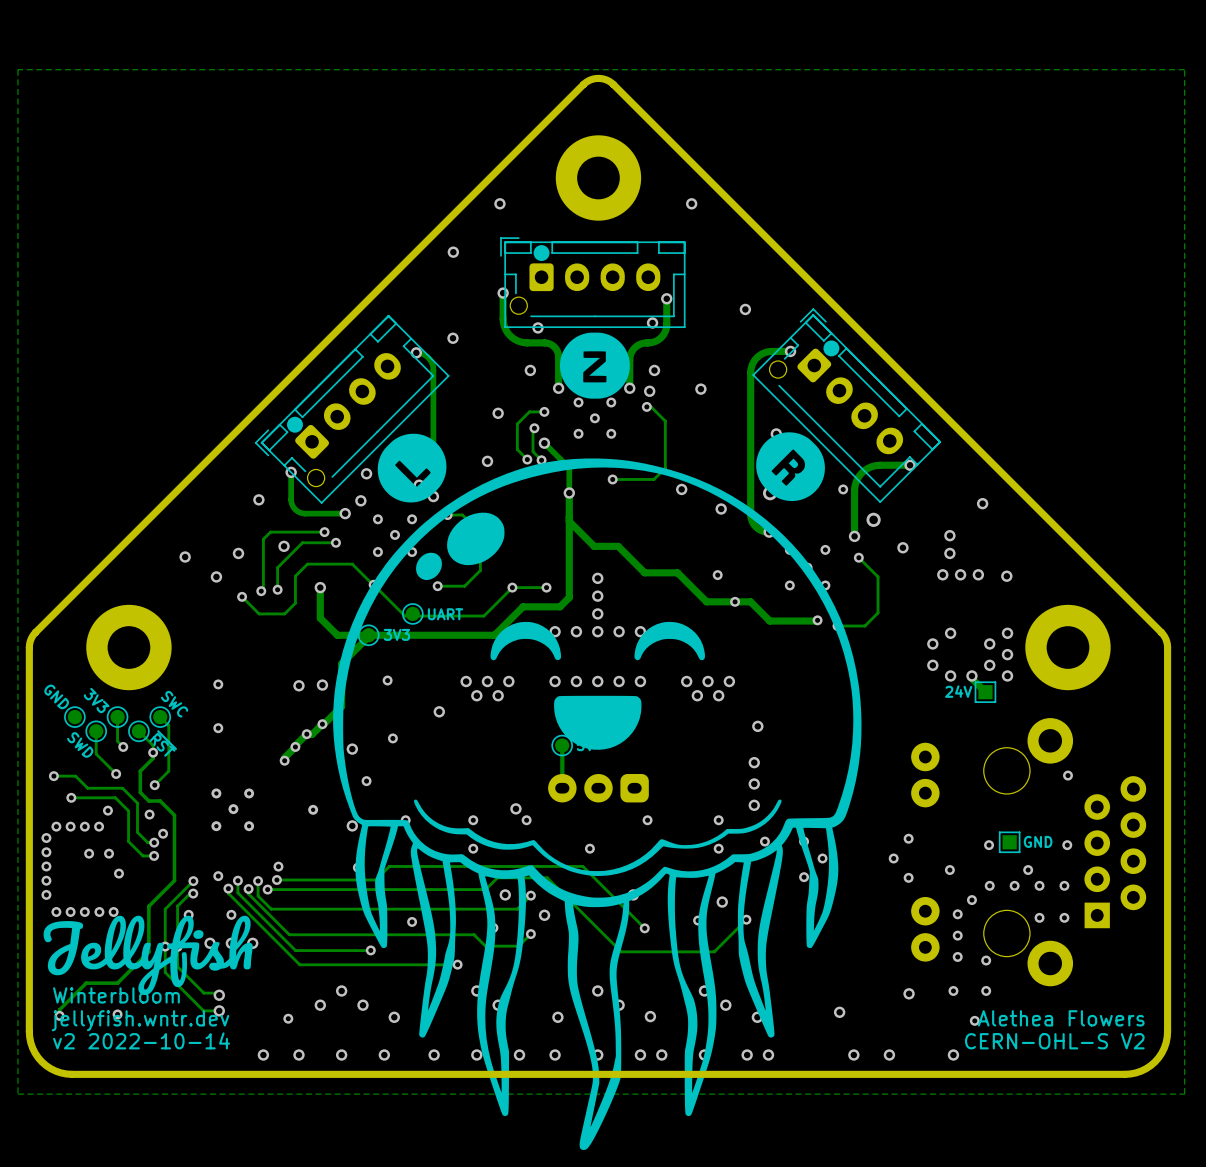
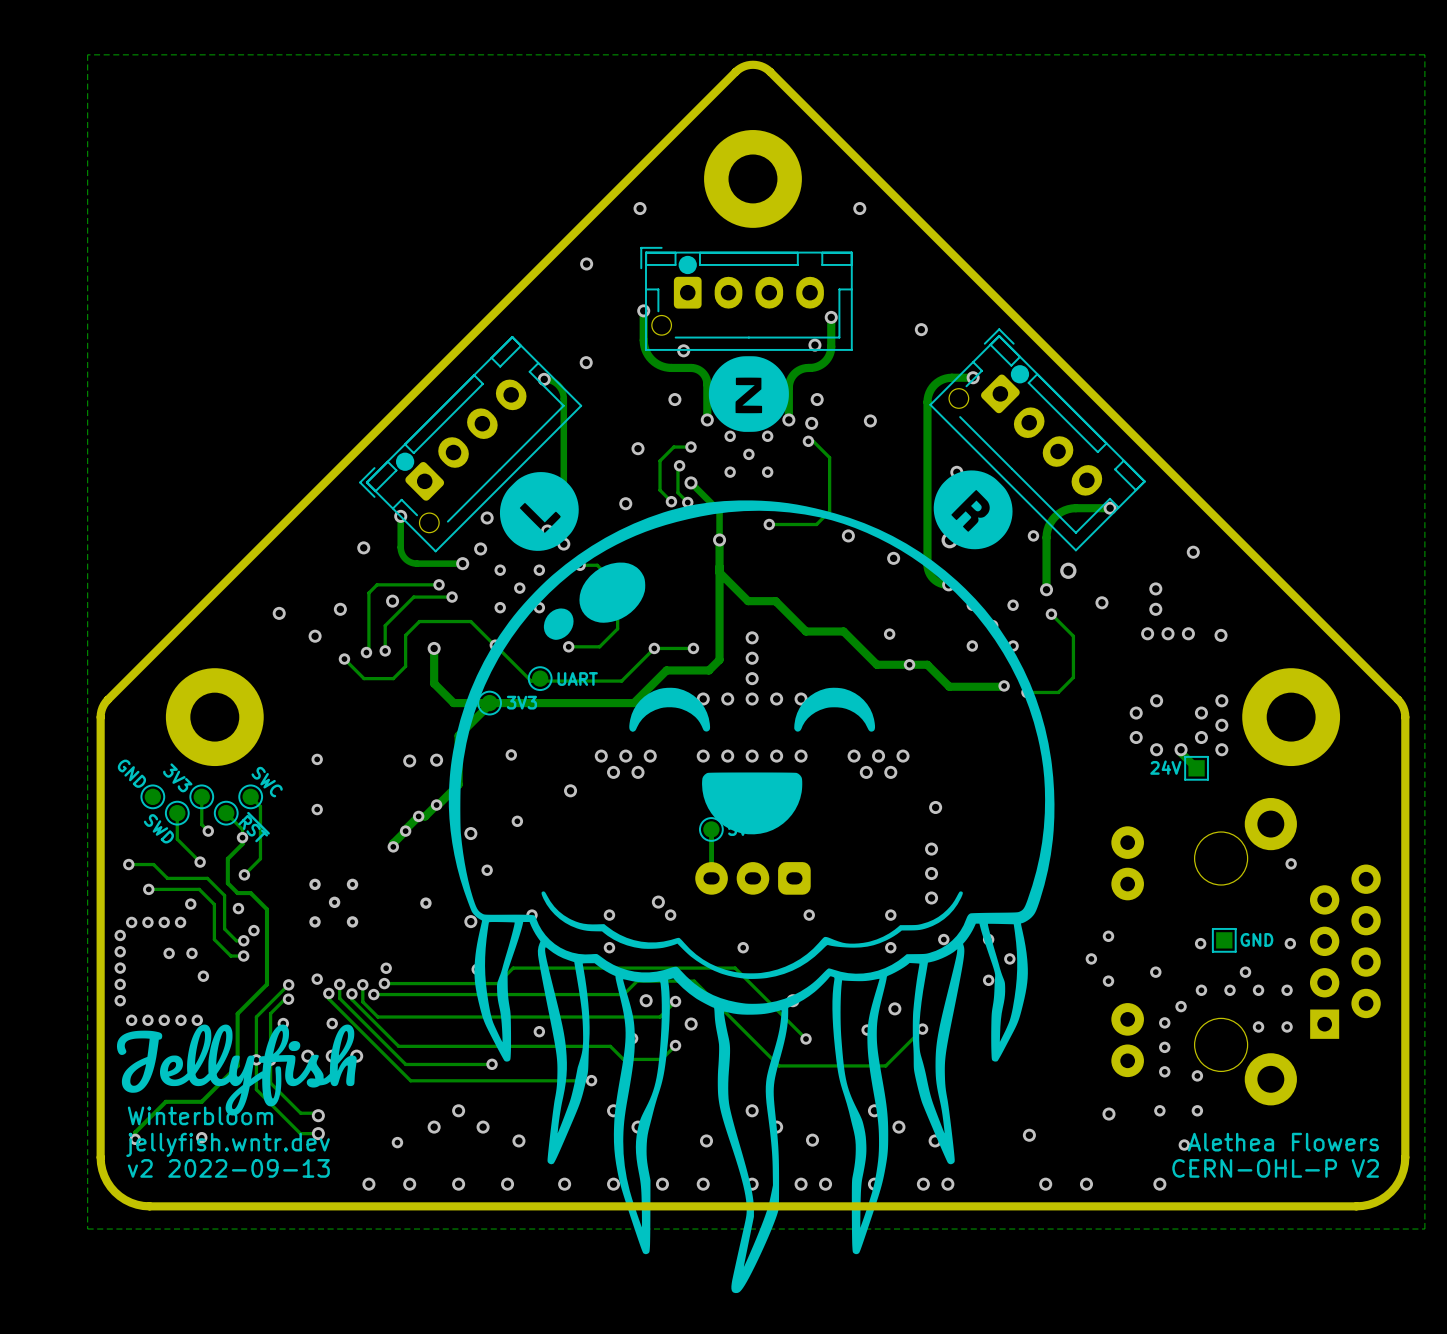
text: v2 2022-10-14 (141, 1040) -> v2 2022-09-13 (228, 1168)
text: CERN-OHL-S V2 (1054, 1041) -> CERN-OHL-P V2 (1275, 1168)

